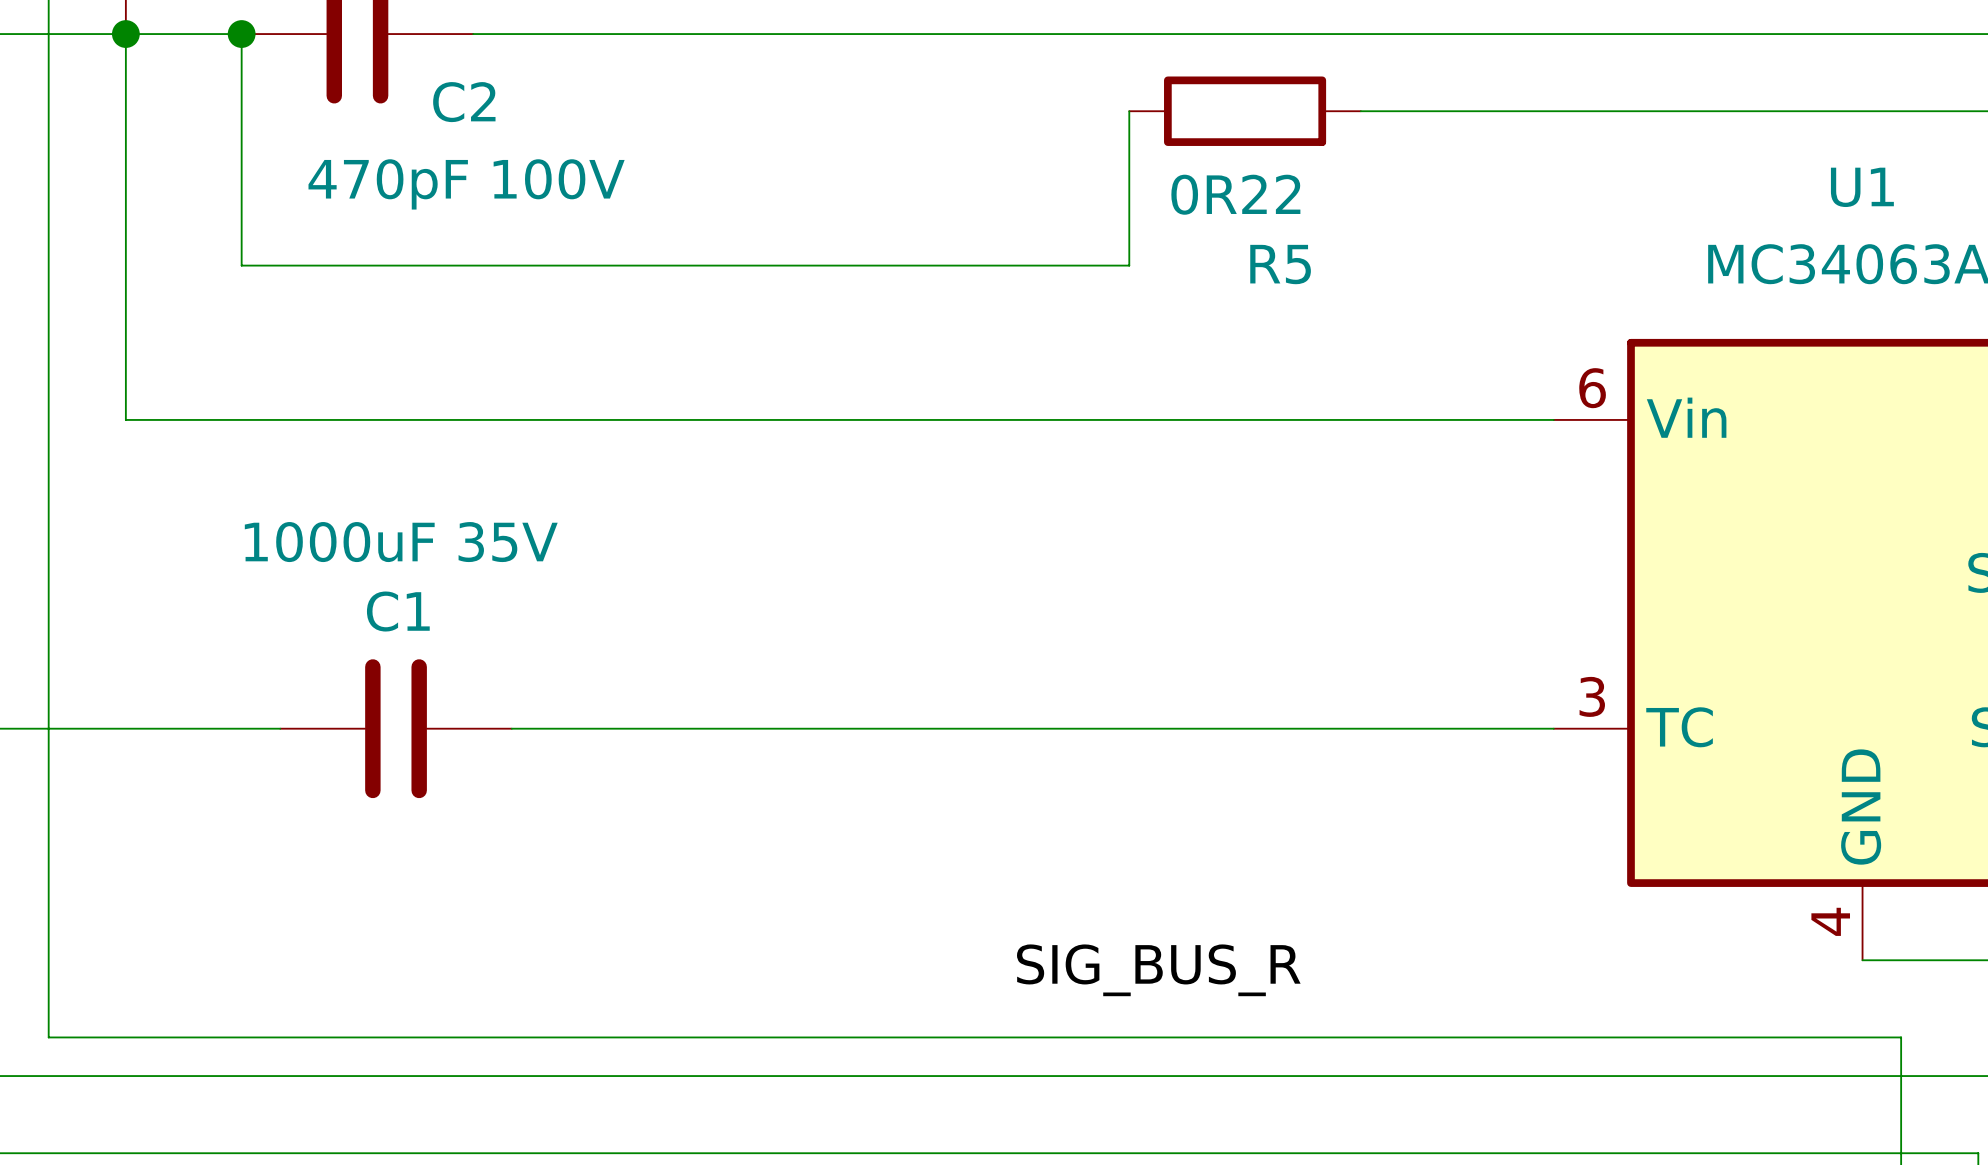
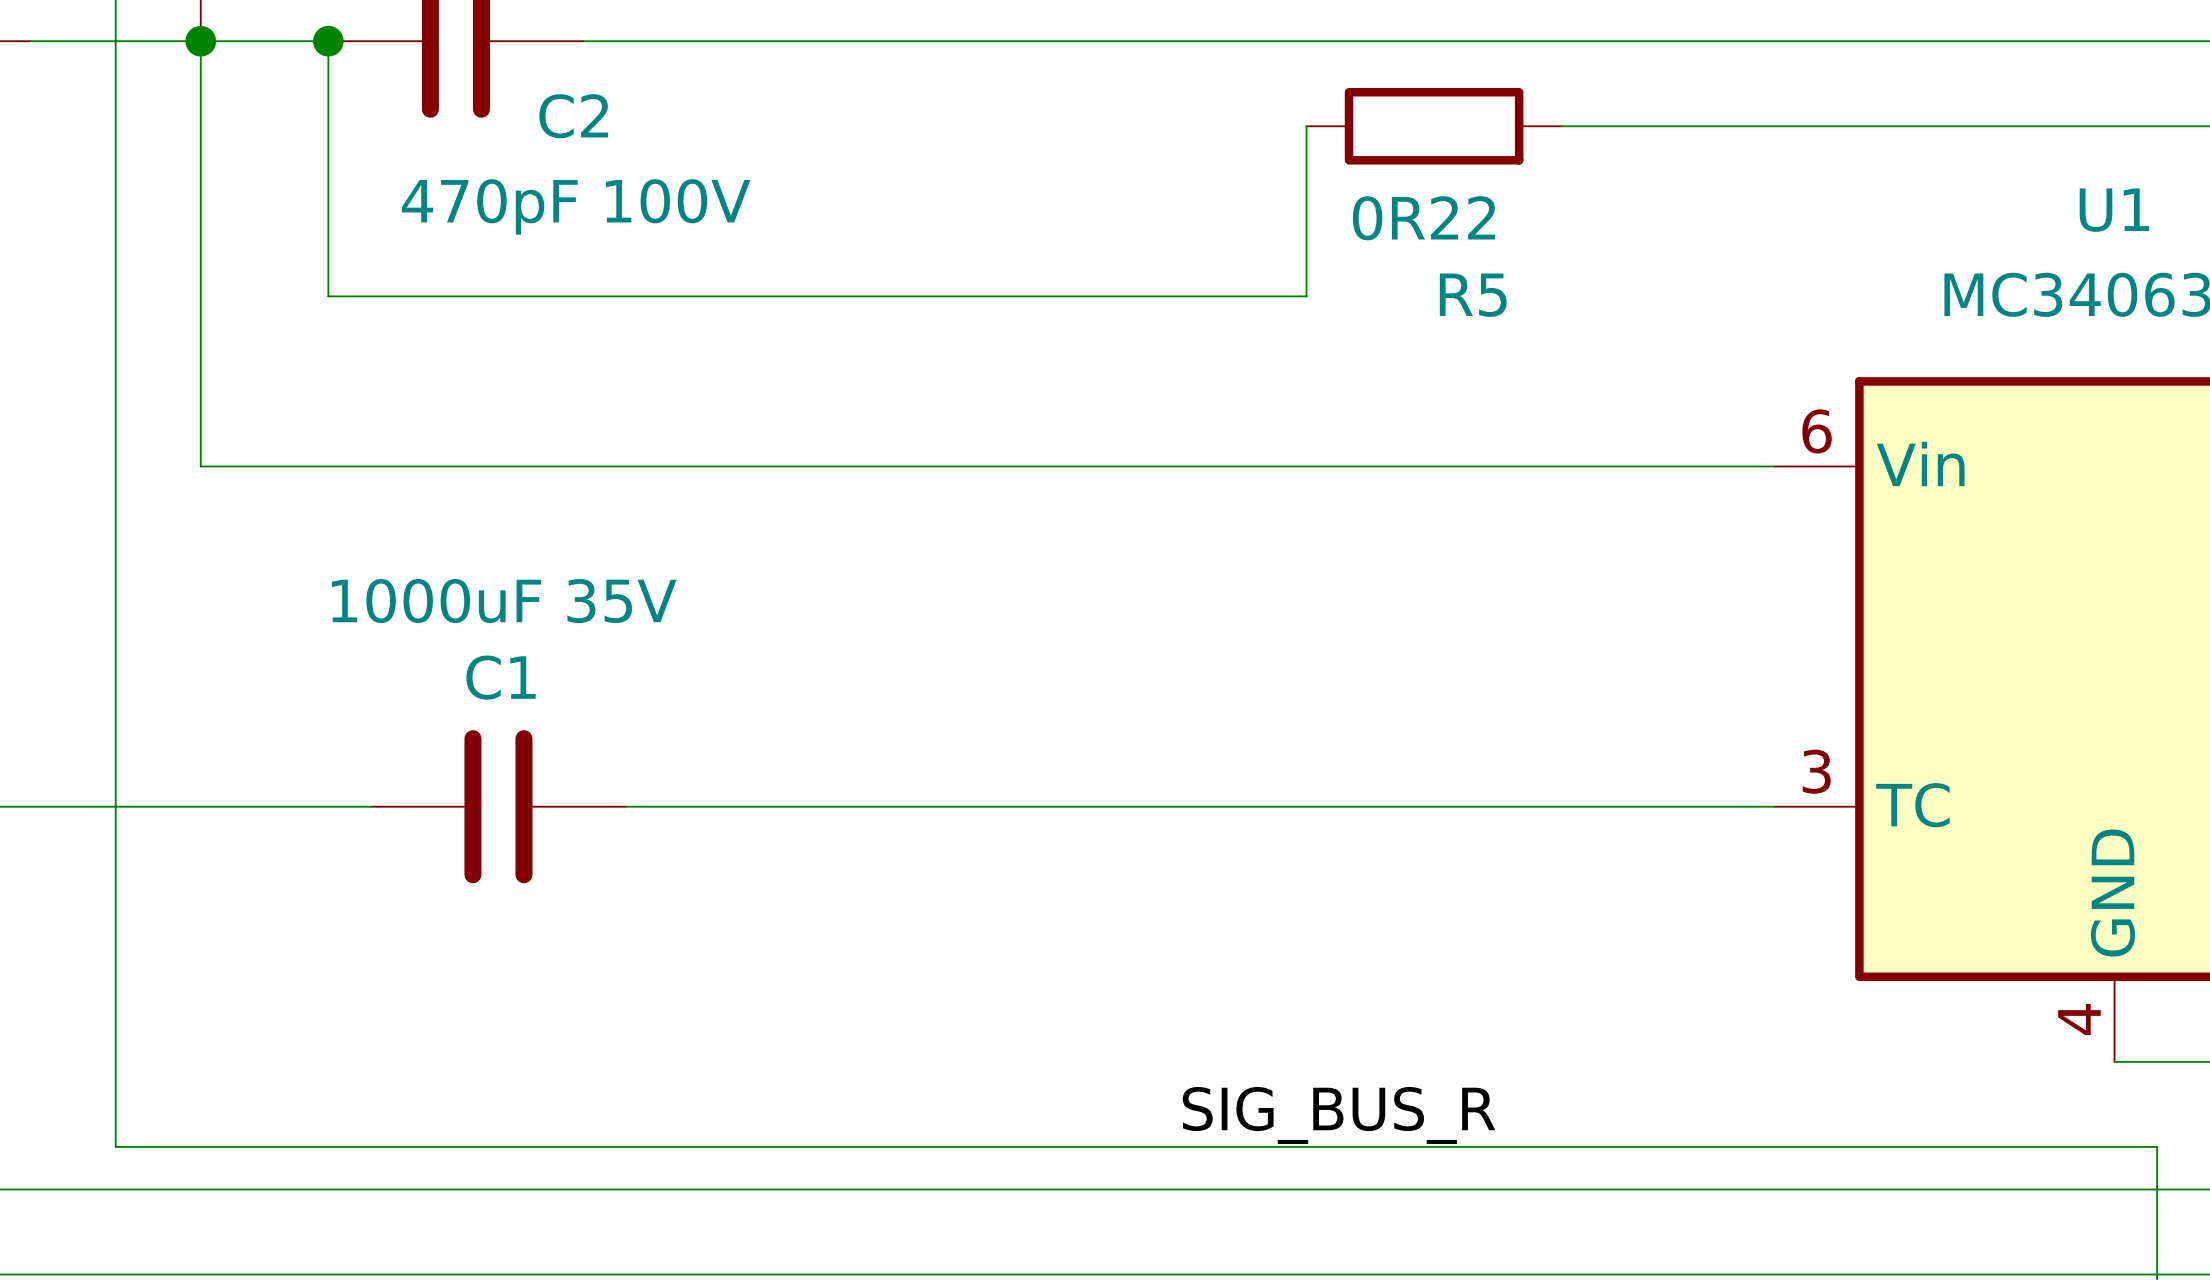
label position: SIG_BUS_R (1158, 970) -> SIG_BUS_R (1339, 1115)

